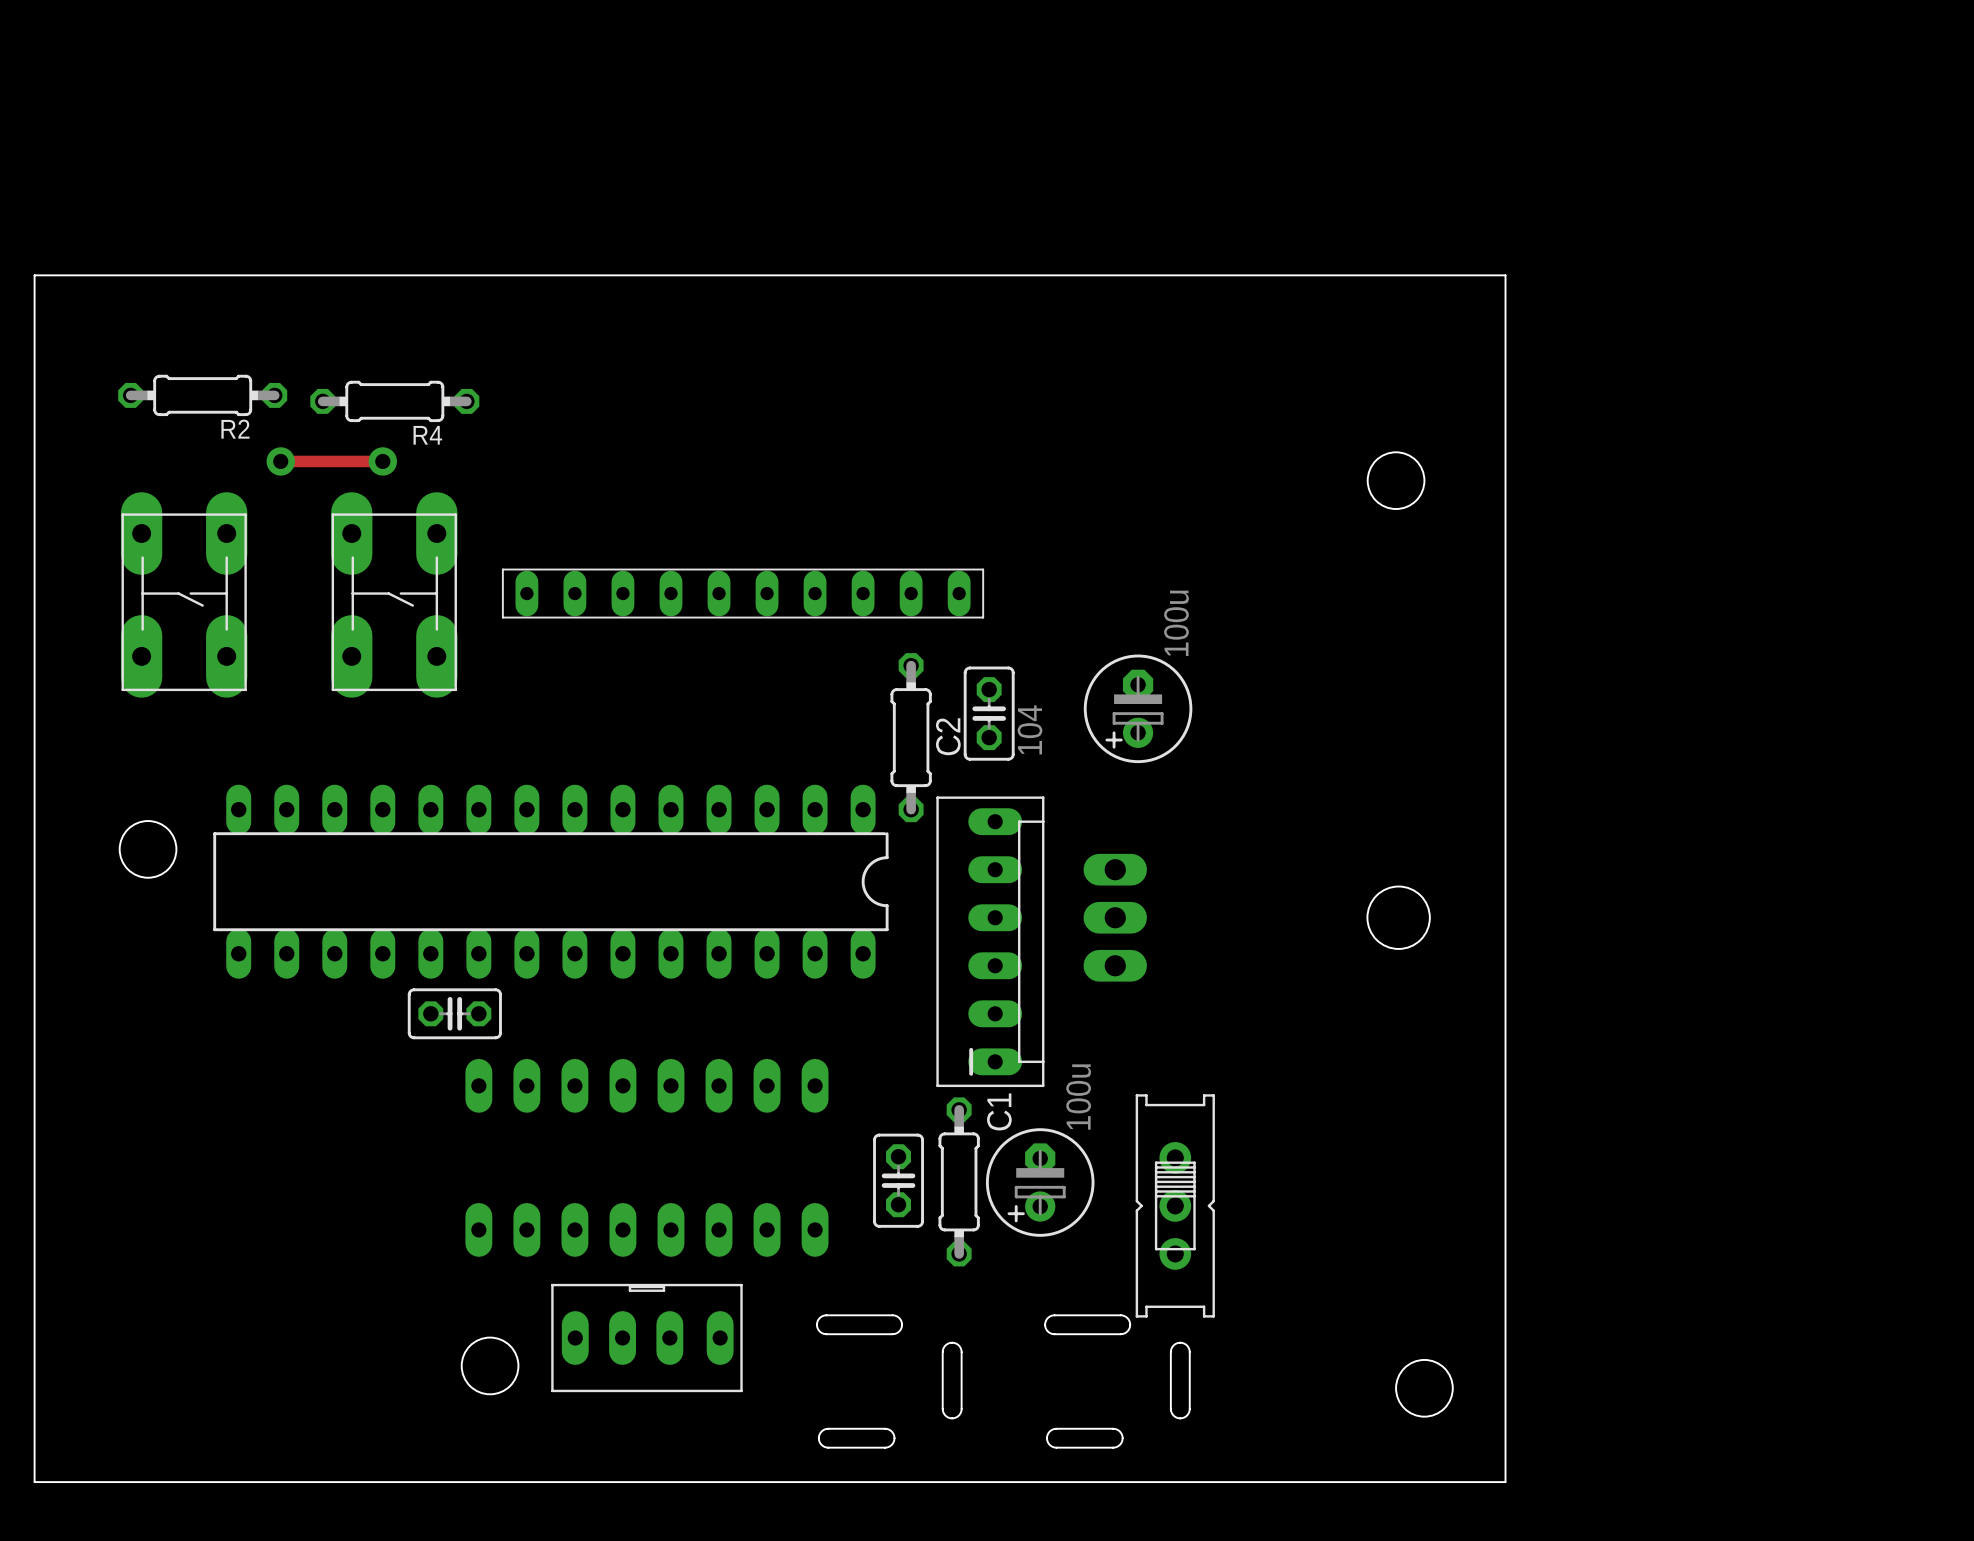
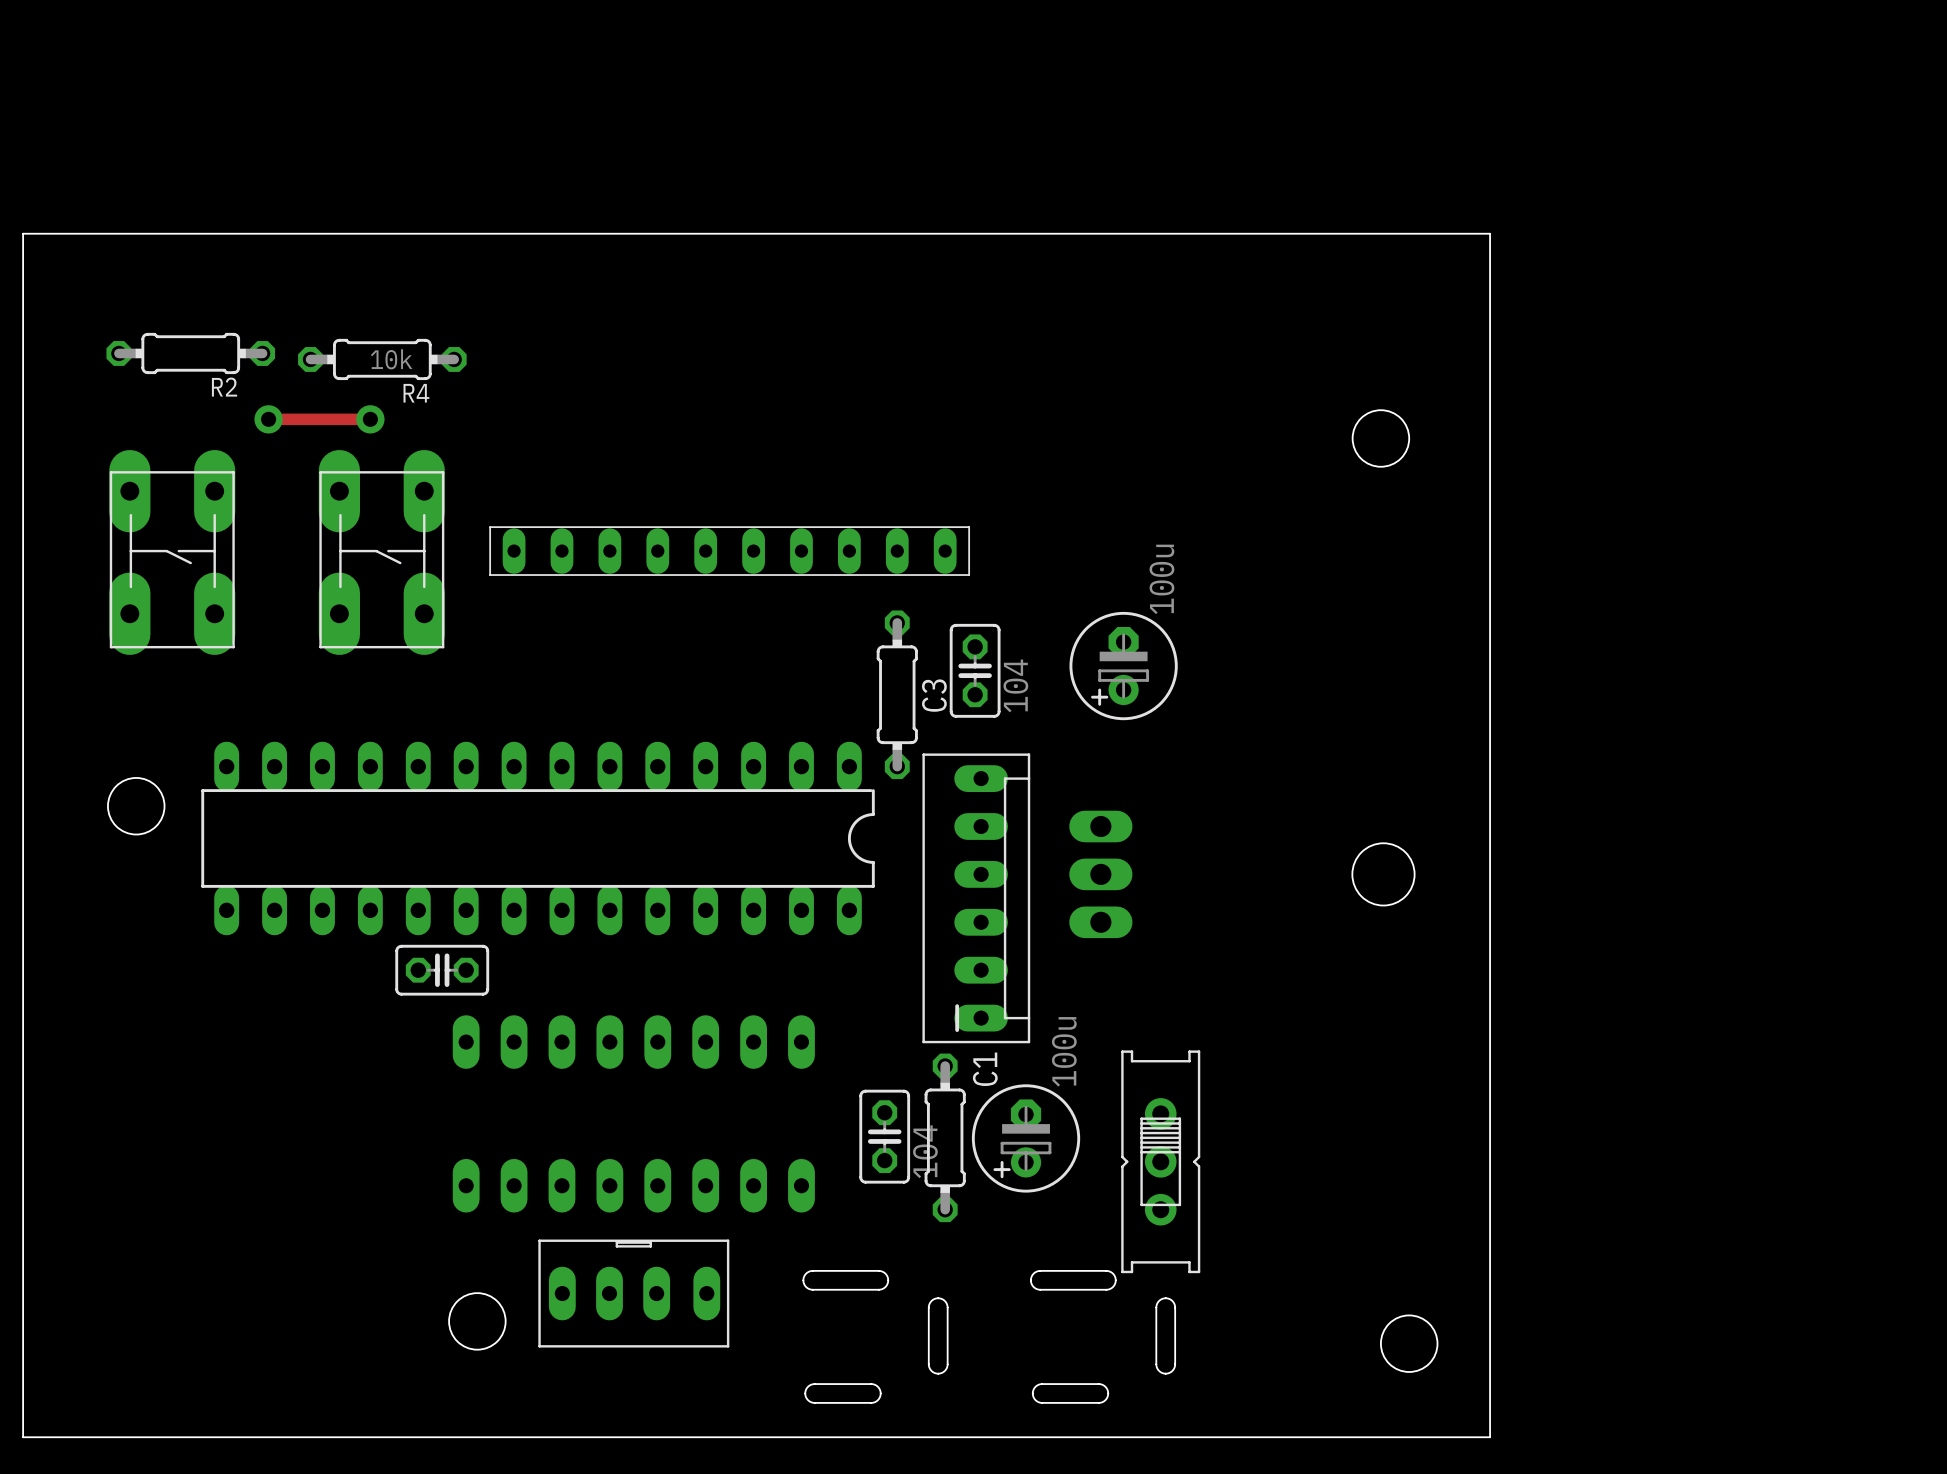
R4 value: none -> 10k (391, 359)
C2 name: C2 (948, 736) -> C3 (934, 695)
part value: none -> 104 (925, 1151)

